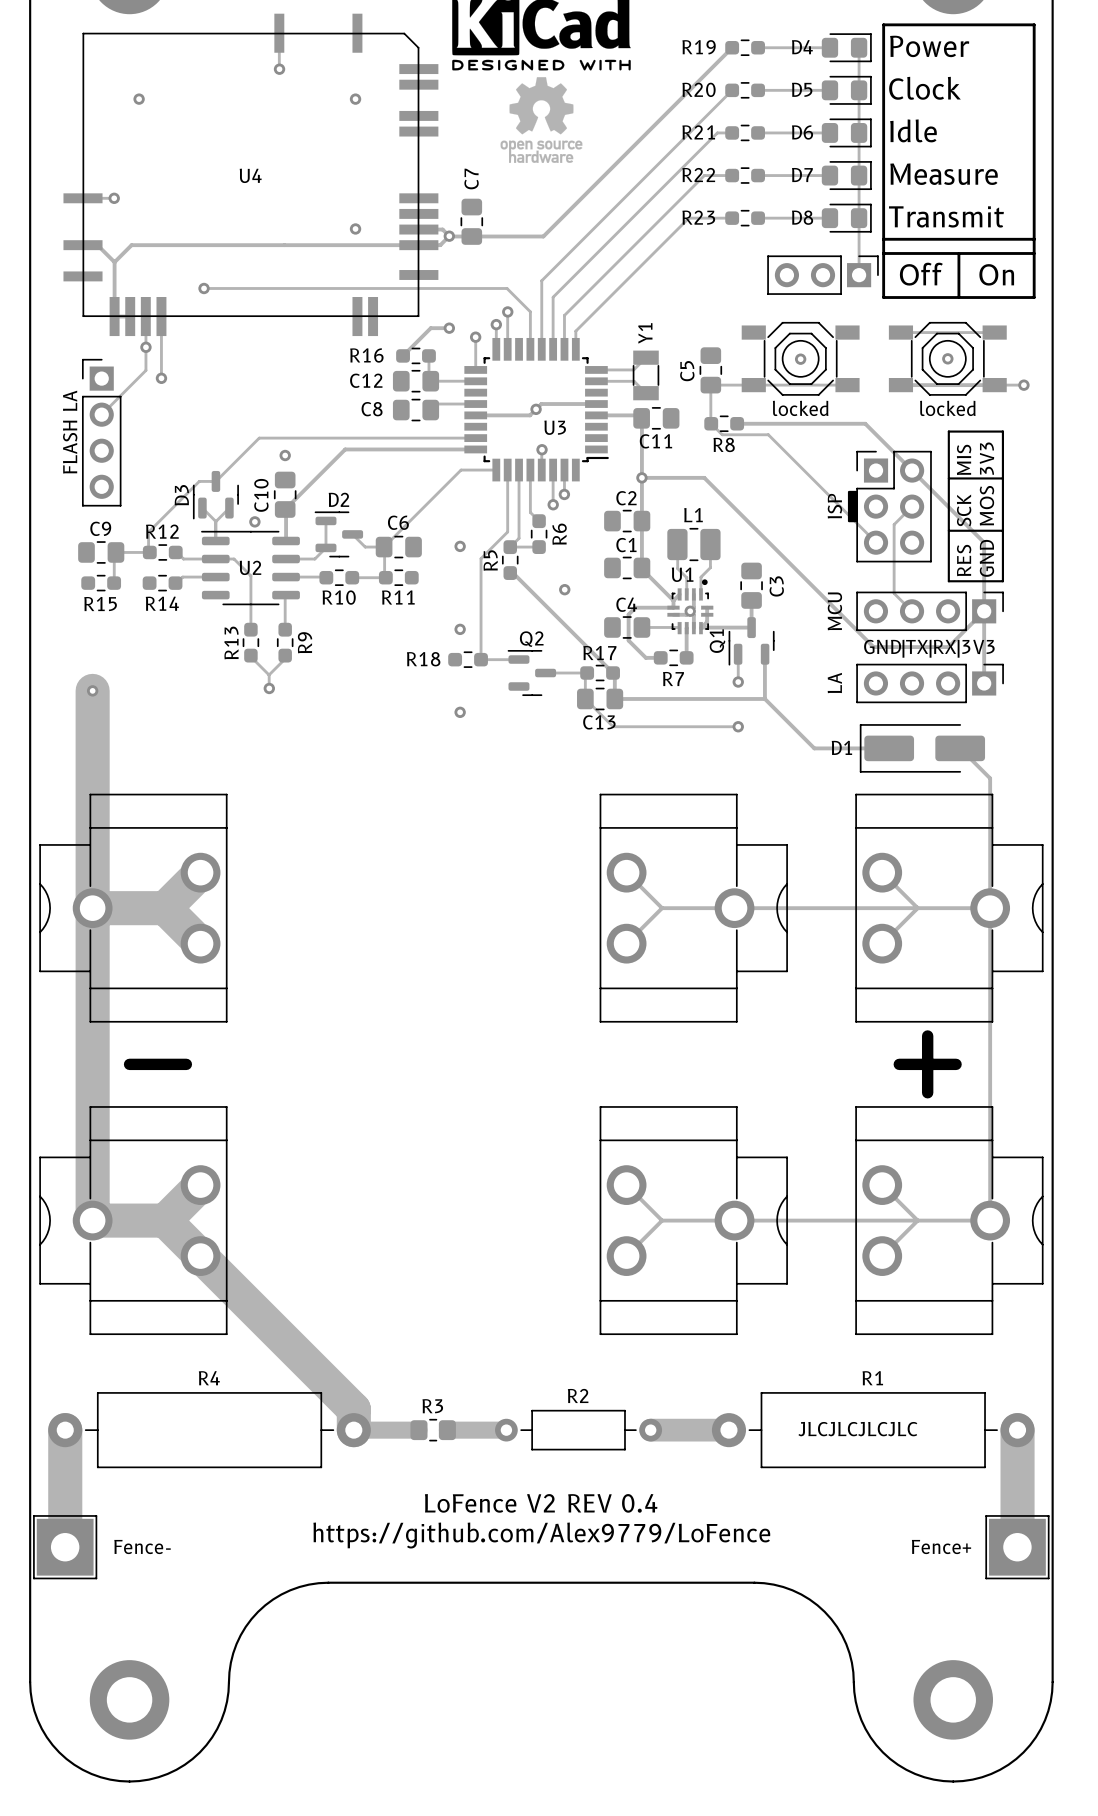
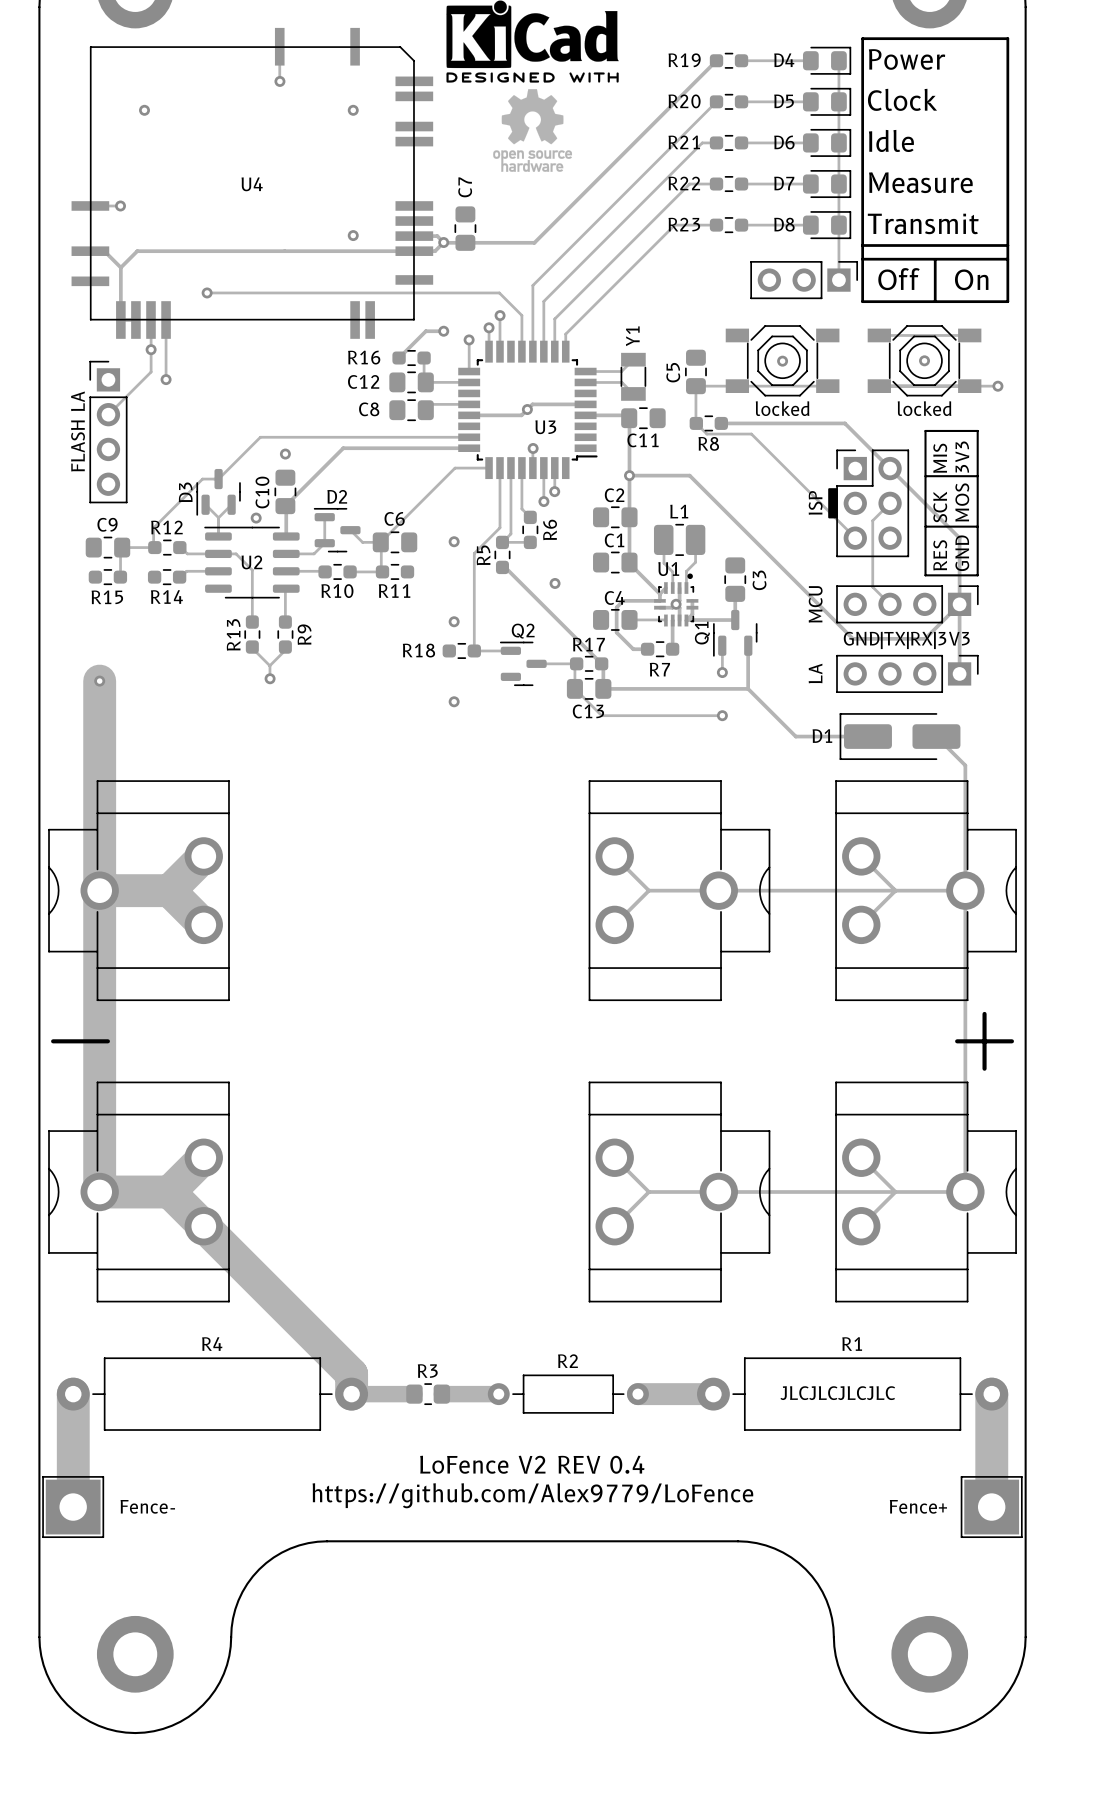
line: (927, 1035) (927, 1092) -> (984, 1013) (984, 1068)
line: (129, 1064) (186, 1064) -> (53, 1041) (107, 1041)
line: (899, 1064) (956, 1064) -> (957, 1041) (1011, 1041)

